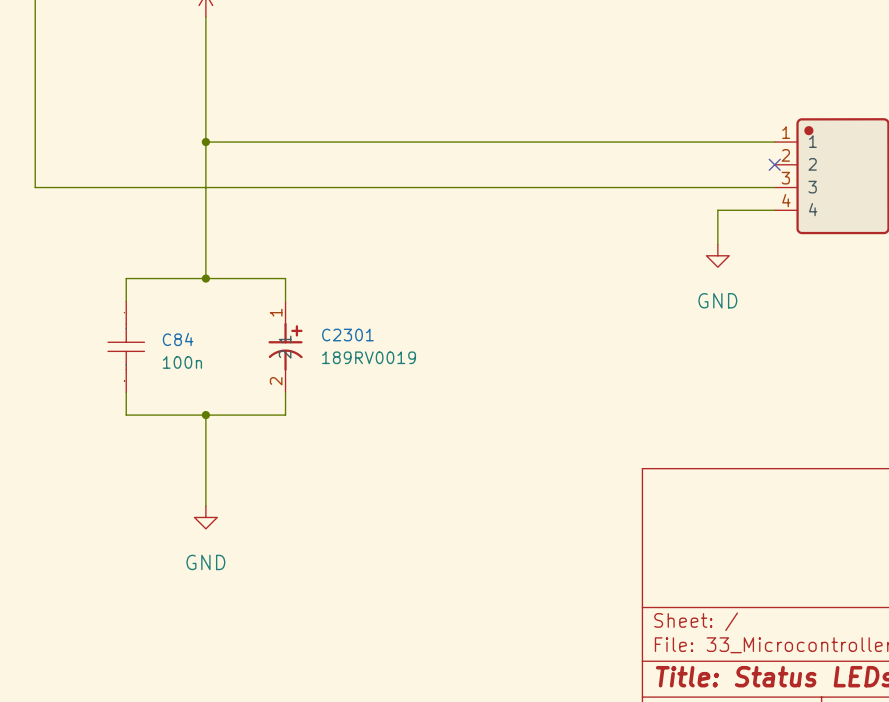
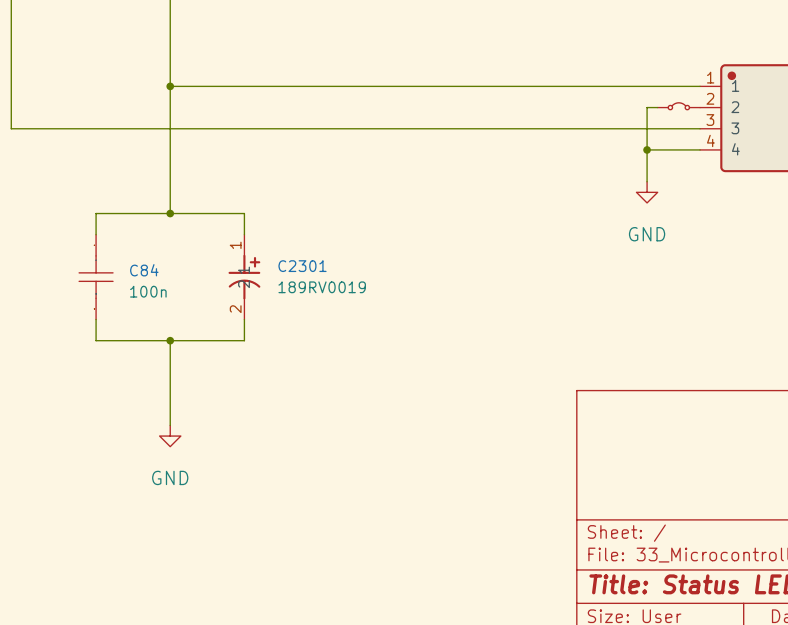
part: none -> (678, 106)
wire: none -> (657, 107) (647, 107) (647, 149)
no-connect mark: (774, 164) -> none
junction: none -> (647, 149)

